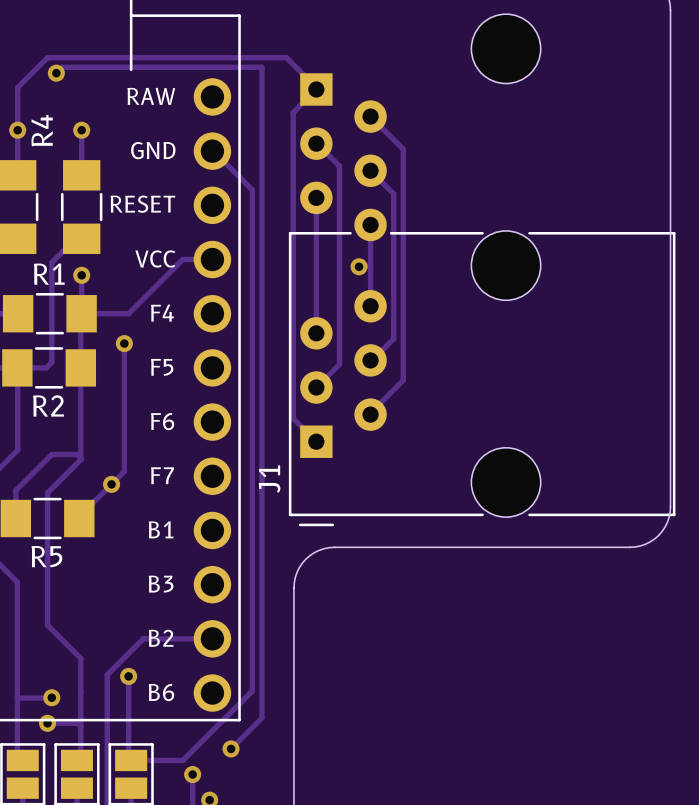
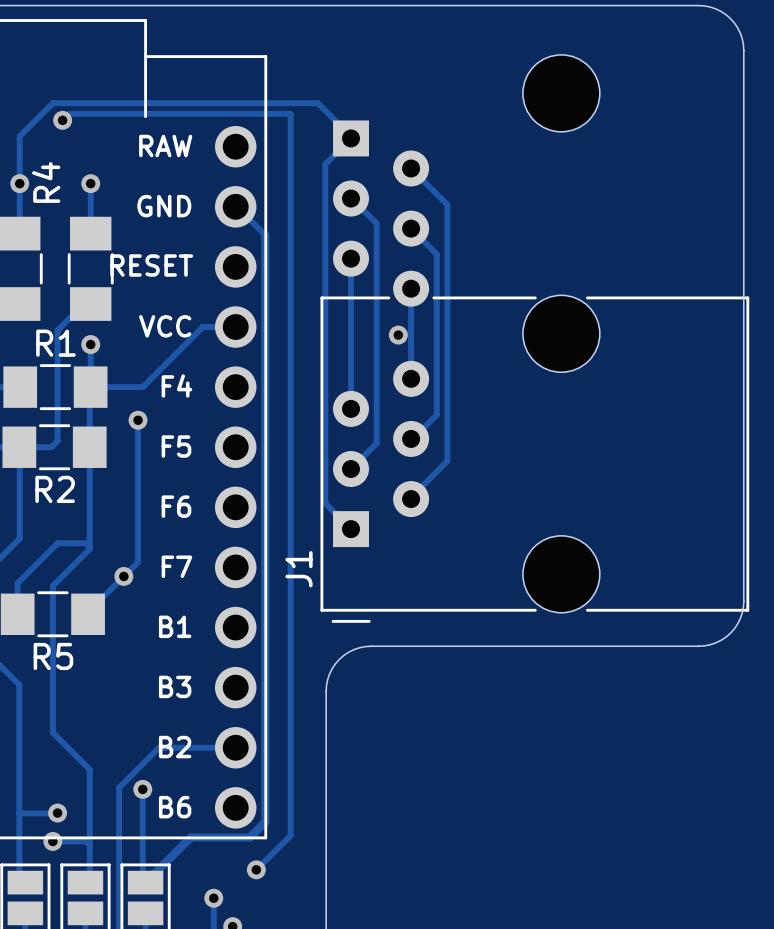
track: (239, 176) (252, 189) (252, 691) (182, 760) (131, 760) -> (265, 235) (265, 822) (249, 837) (190, 837) (145, 882)

